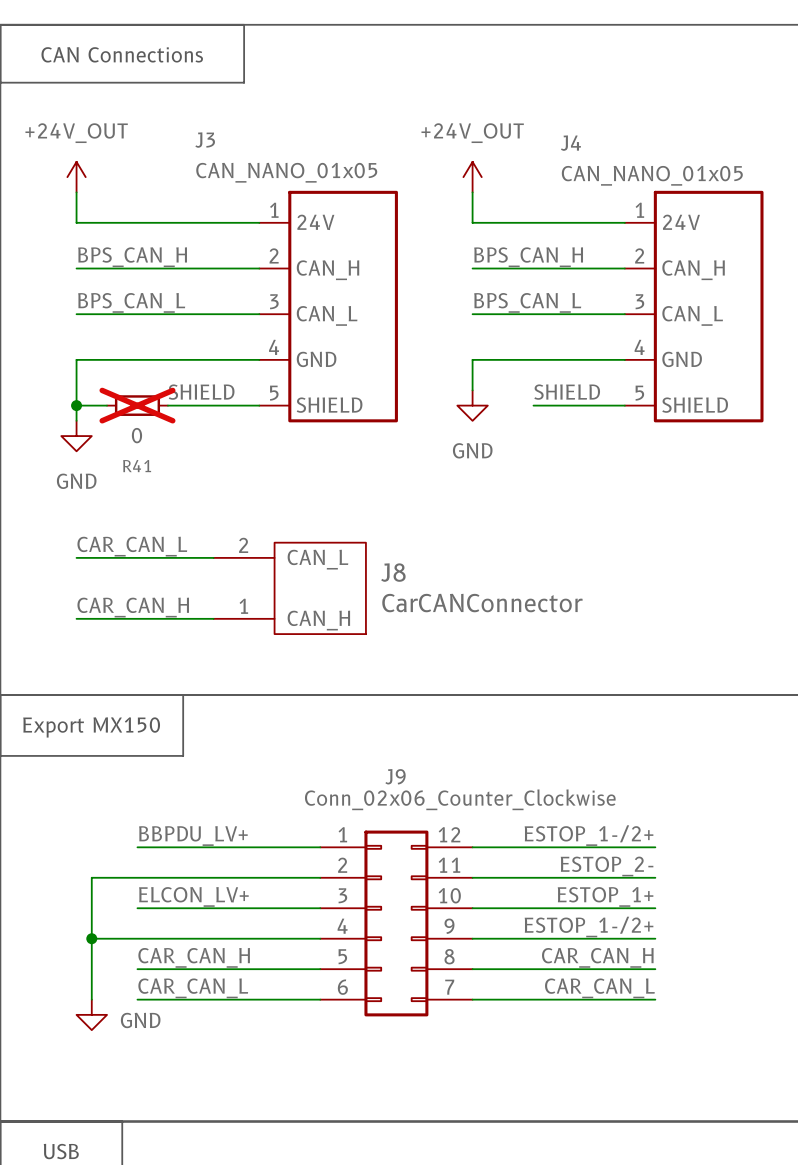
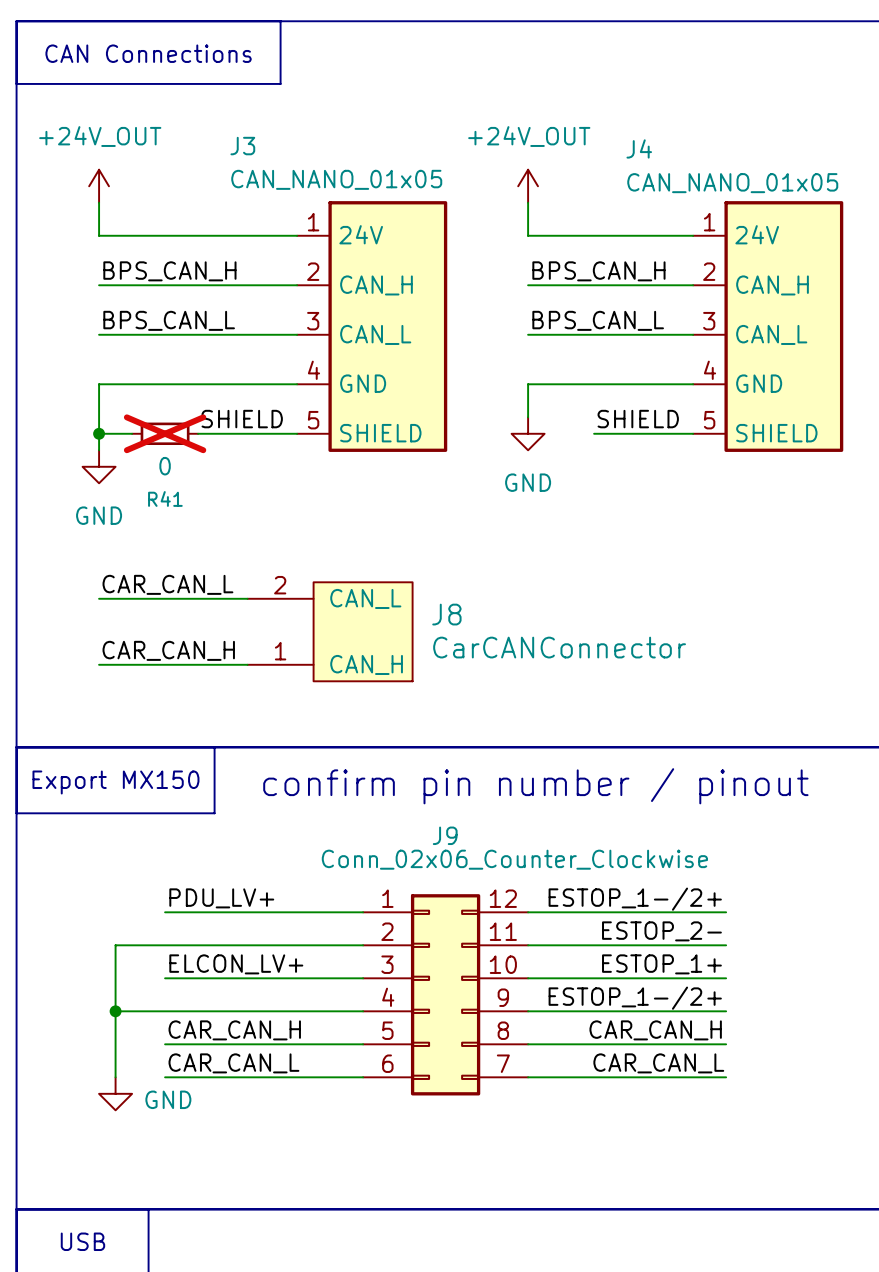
text: none -> confirm pin number / pinout (535, 786)
label: BBPDU_LV+ (193, 836) -> PDU_LV+ (221, 898)

